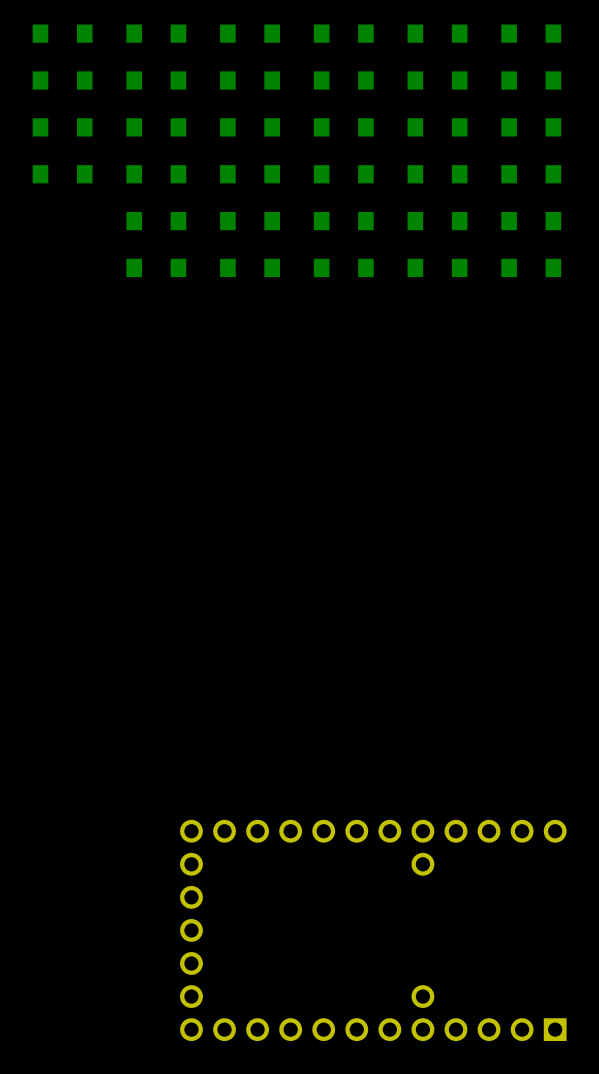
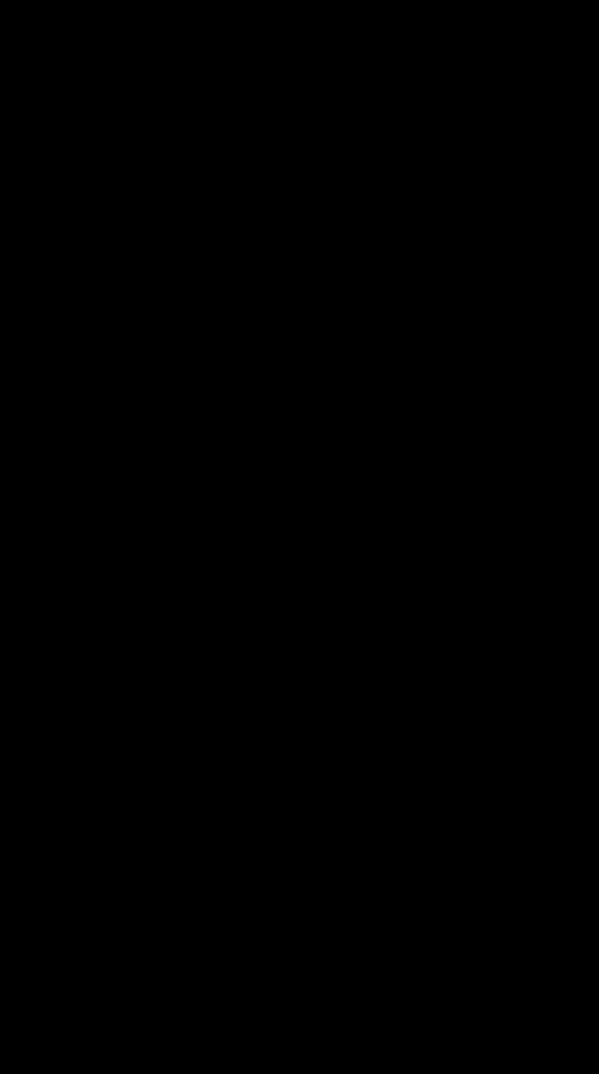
part: (62, 33) -> none
part: (156, 33) -> none
part: (250, 33) -> none
part: (343, 33) -> none
part: (437, 33) -> none
part: (531, 33) -> none
part: (62, 80) -> none
part: (156, 80) -> none
part: (250, 80) -> none
part: (343, 80) -> none
part: (437, 80) -> none
part: (531, 80) -> none
part: (62, 127) -> none
part: (156, 127) -> none
part: (250, 127) -> none
part: (343, 127) -> none
part: (437, 127) -> none
part: (531, 127) -> none
part: (62, 174) -> none
part: (156, 174) -> none
part: (250, 174) -> none
part: (343, 174) -> none
part: (437, 174) -> none
part: (531, 174) -> none
part: (156, 221) -> none
part: (250, 221) -> none
part: (343, 221) -> none
part: (437, 221) -> none
part: (531, 221) -> none
part: (156, 267) -> none
part: (250, 267) -> none
part: (343, 267) -> none
part: (437, 267) -> none
part: (531, 267) -> none
part: (373, 930) -> none

